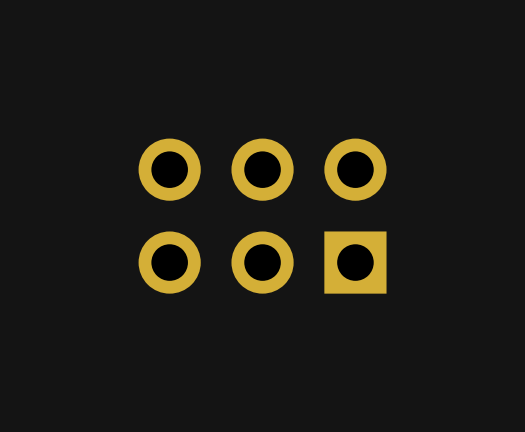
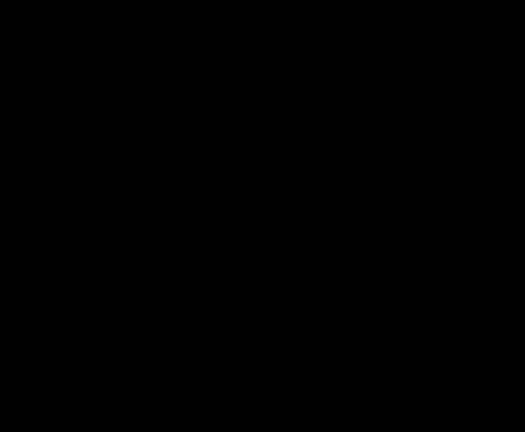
part: (262, 216) -> none

